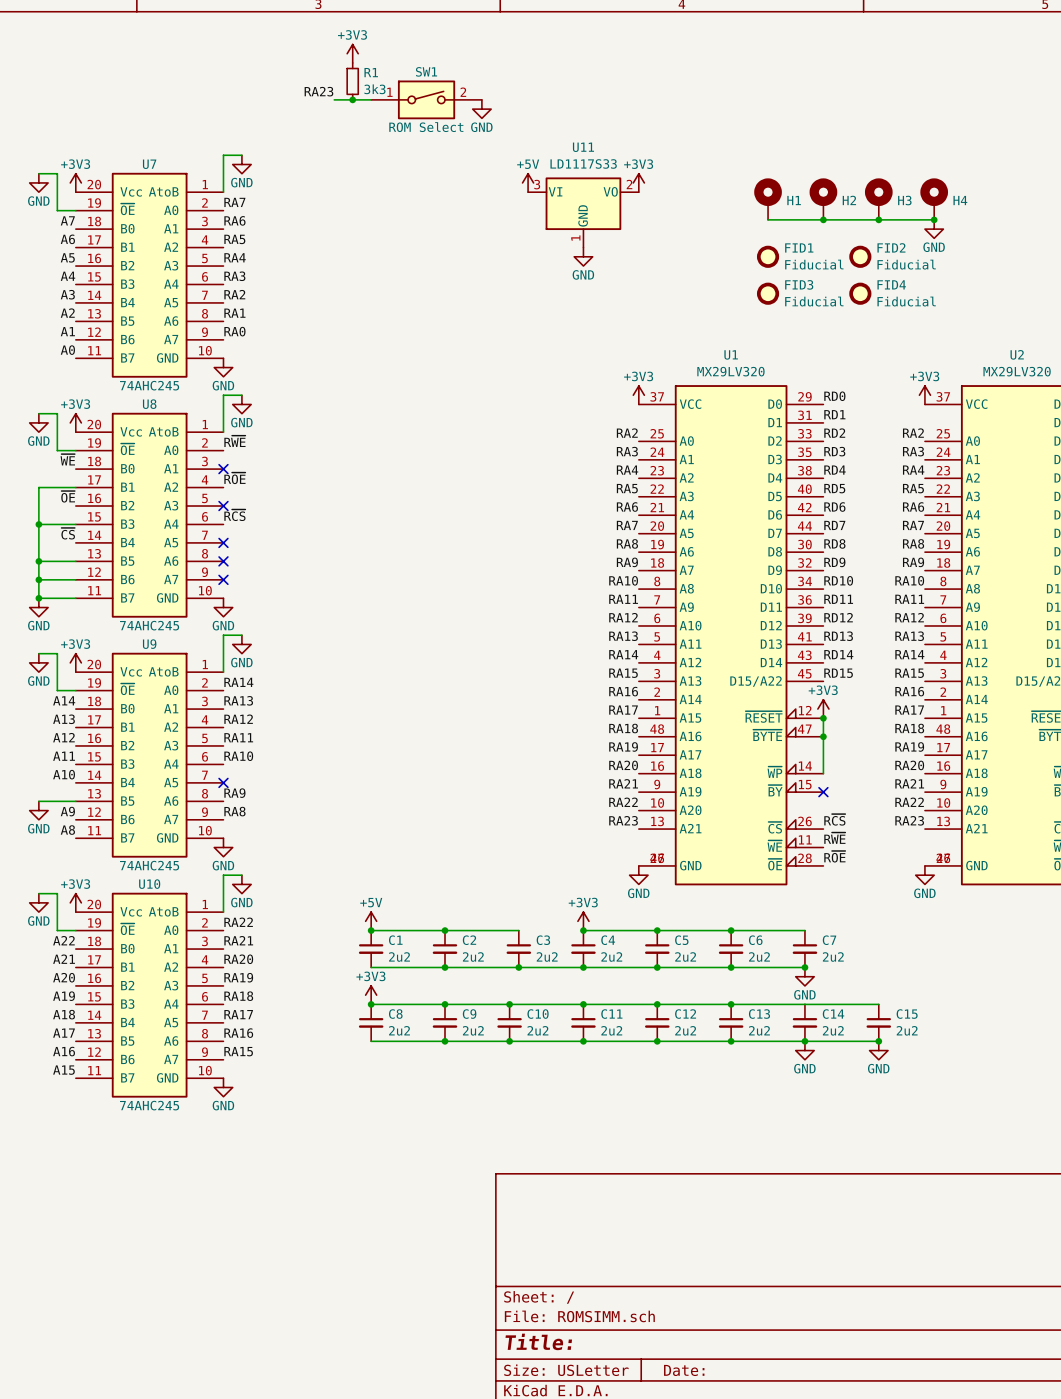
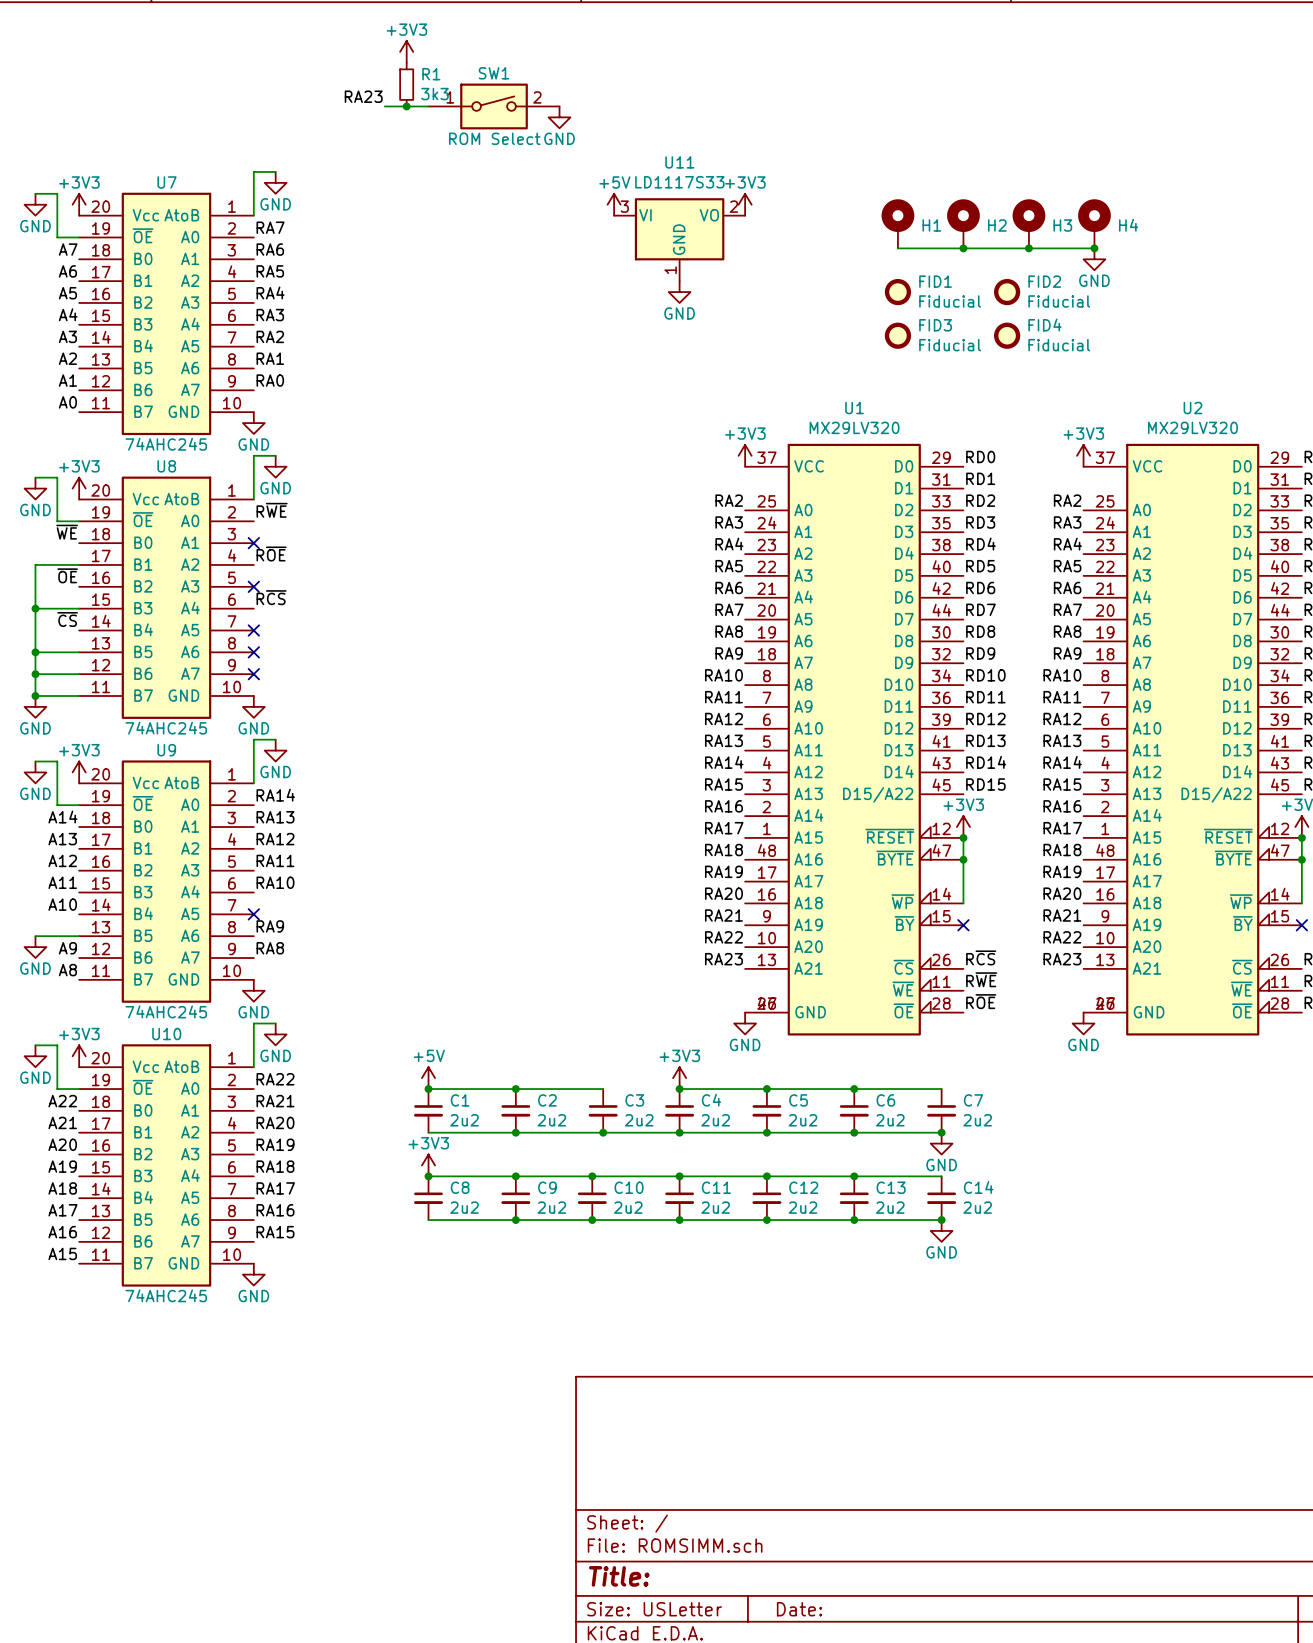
wire: (804, 1004) (878, 1004) -> none
C15: 2u2 (878, 1022) -> none
wire: (804, 1041) (878, 1041) -> none
junction: (878, 1041) -> none
power symbol: GND (878, 1050) -> none

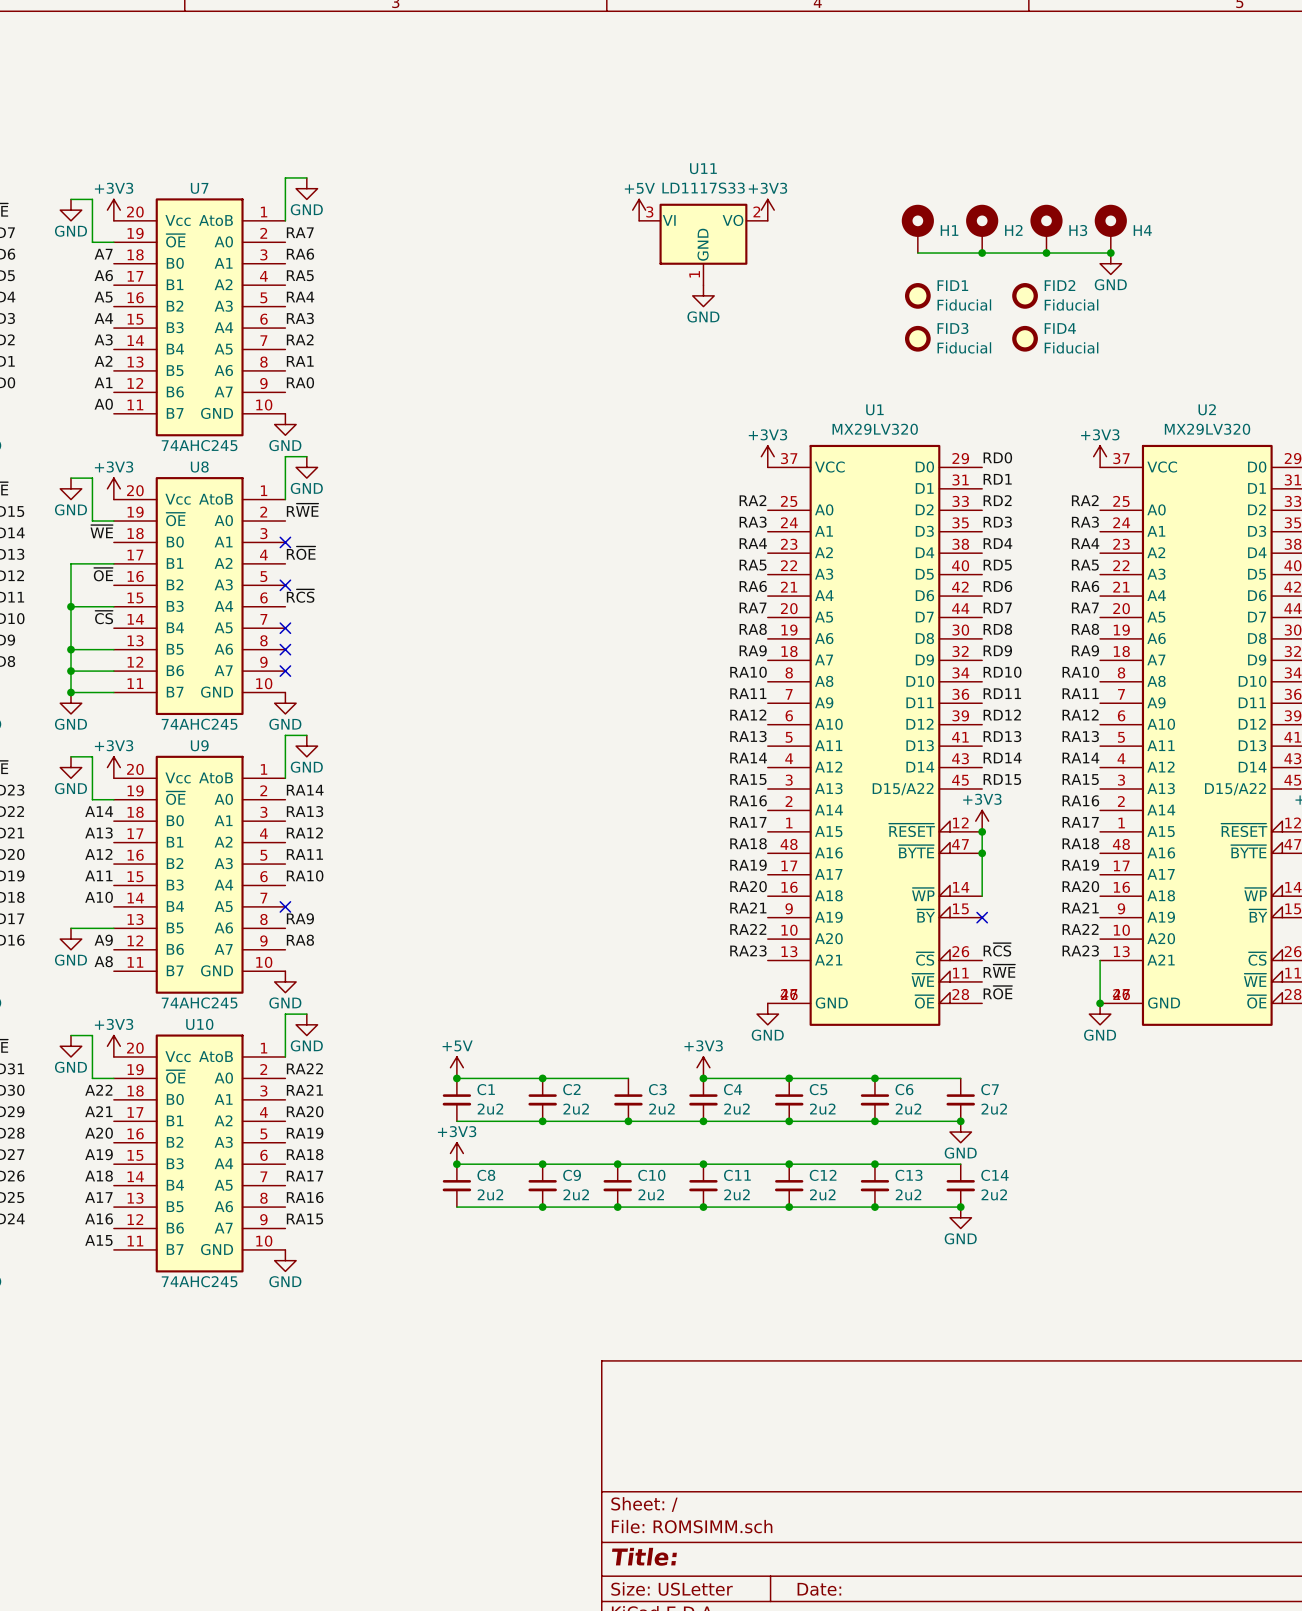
power symbol: +3V3 (406, 51) -> none
R1: 3k3 (406, 84) -> none
label: RA23 (363, 96) -> none
wire: (384, 106) (428, 106) -> none
junction: (406, 106) -> none
SW1: ROM Select (494, 106) -> none
power symbol: GND (559, 117) -> none
wire: none -> (1100, 960) (1100, 1003)
junction: none -> (1100, 1003)

